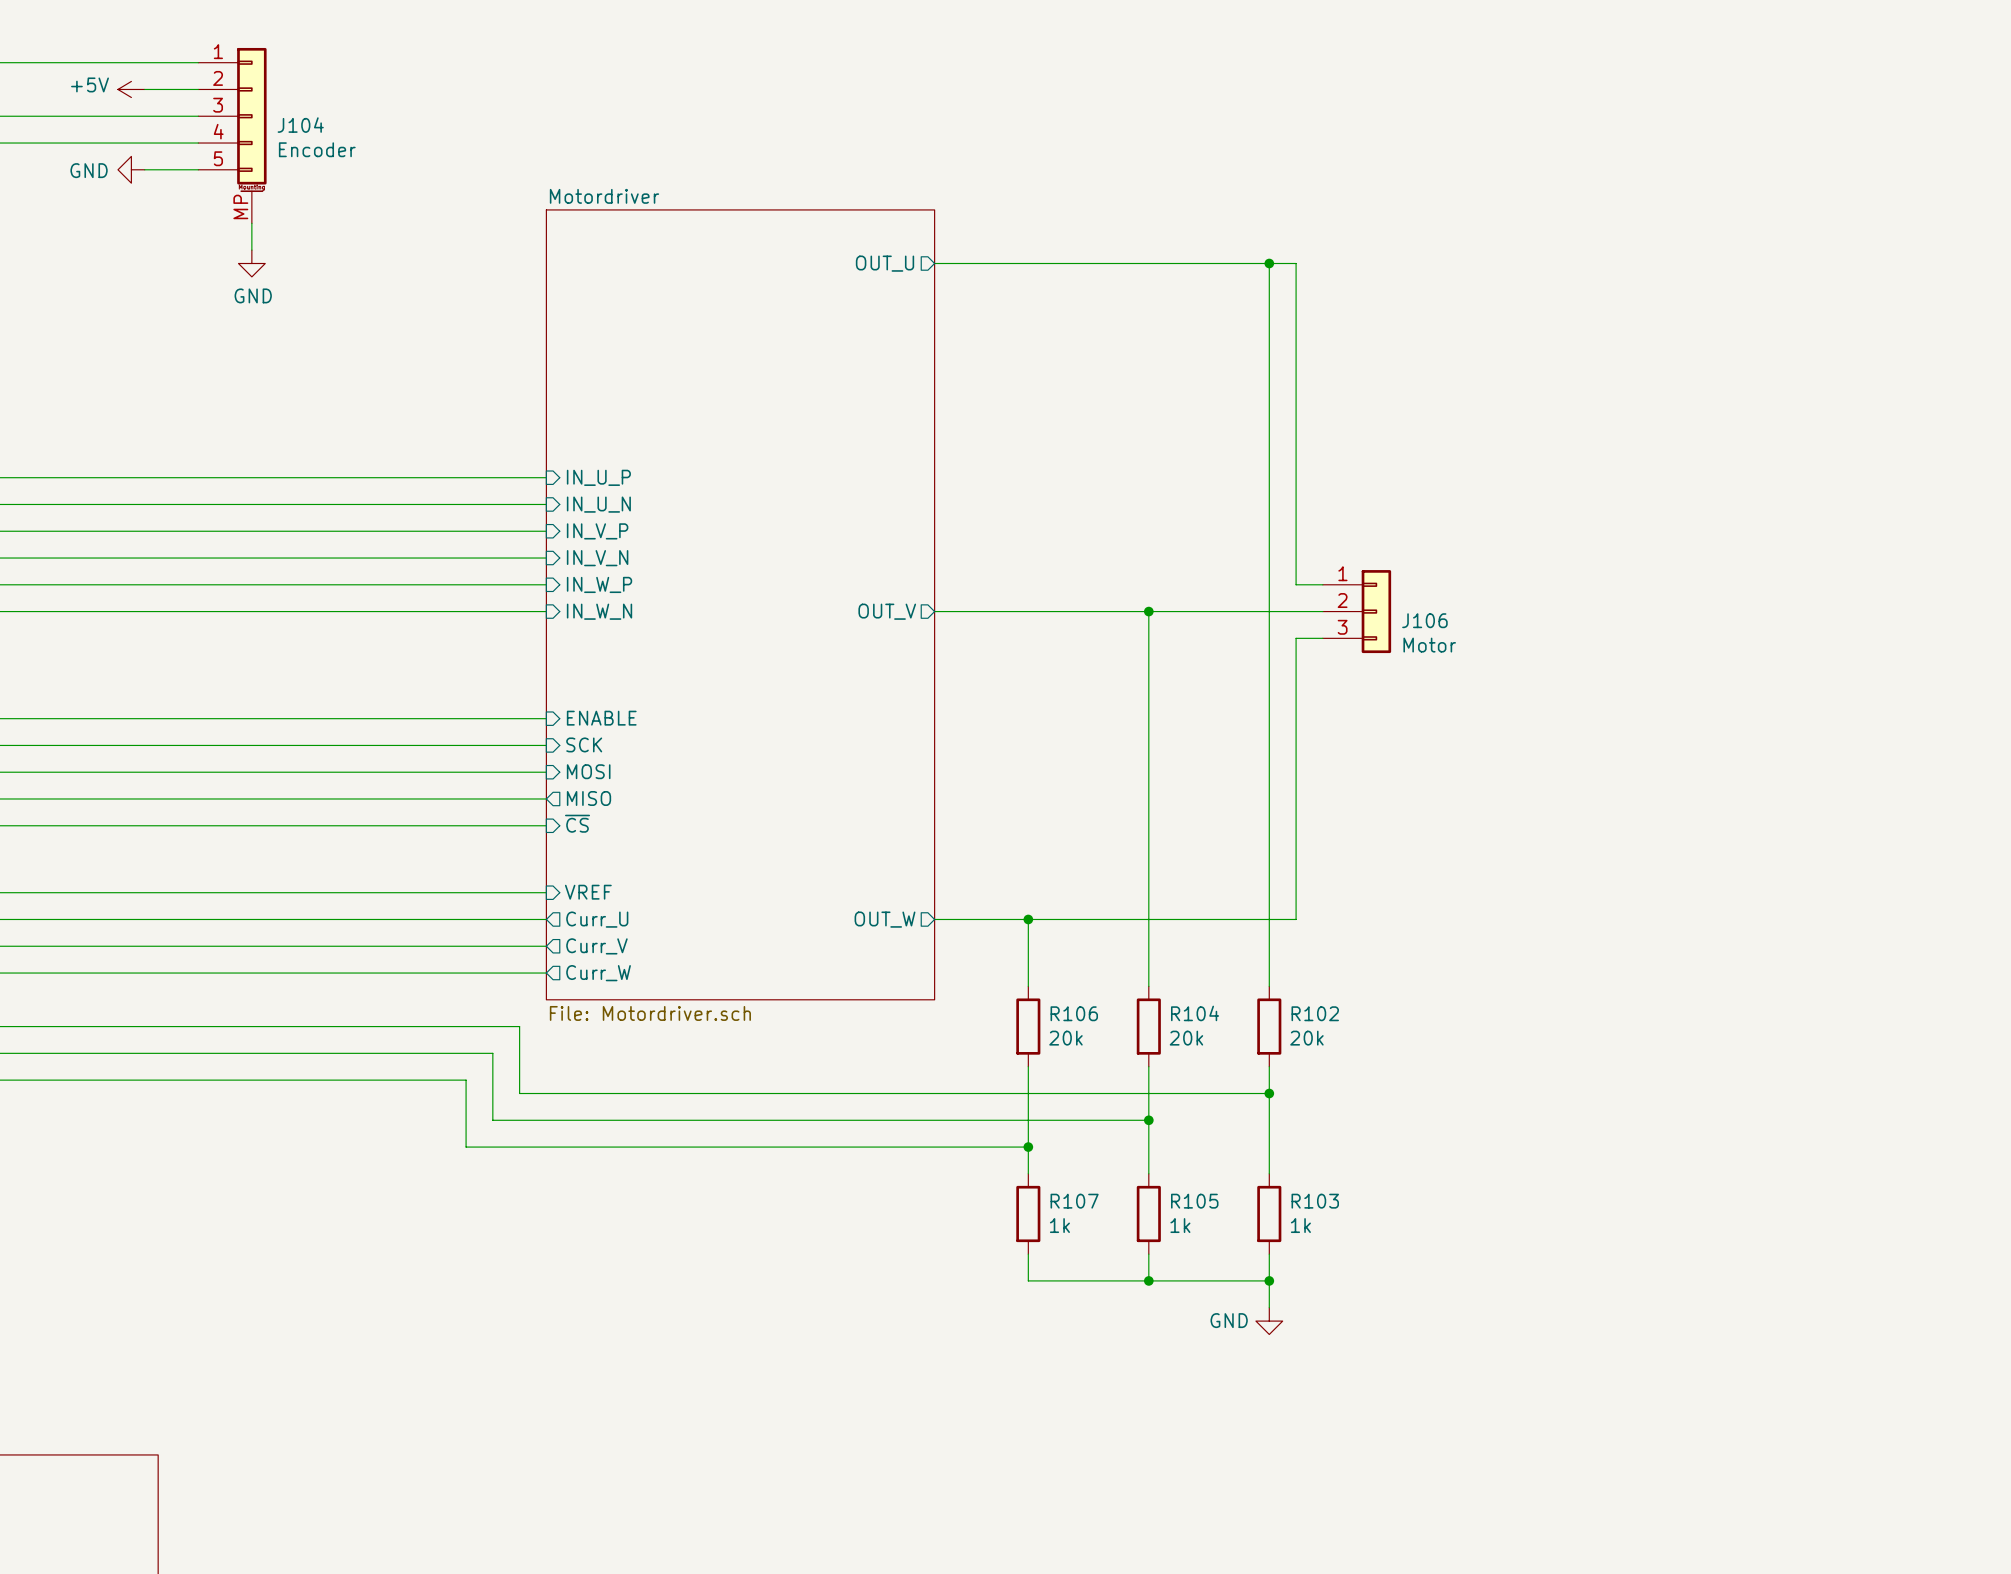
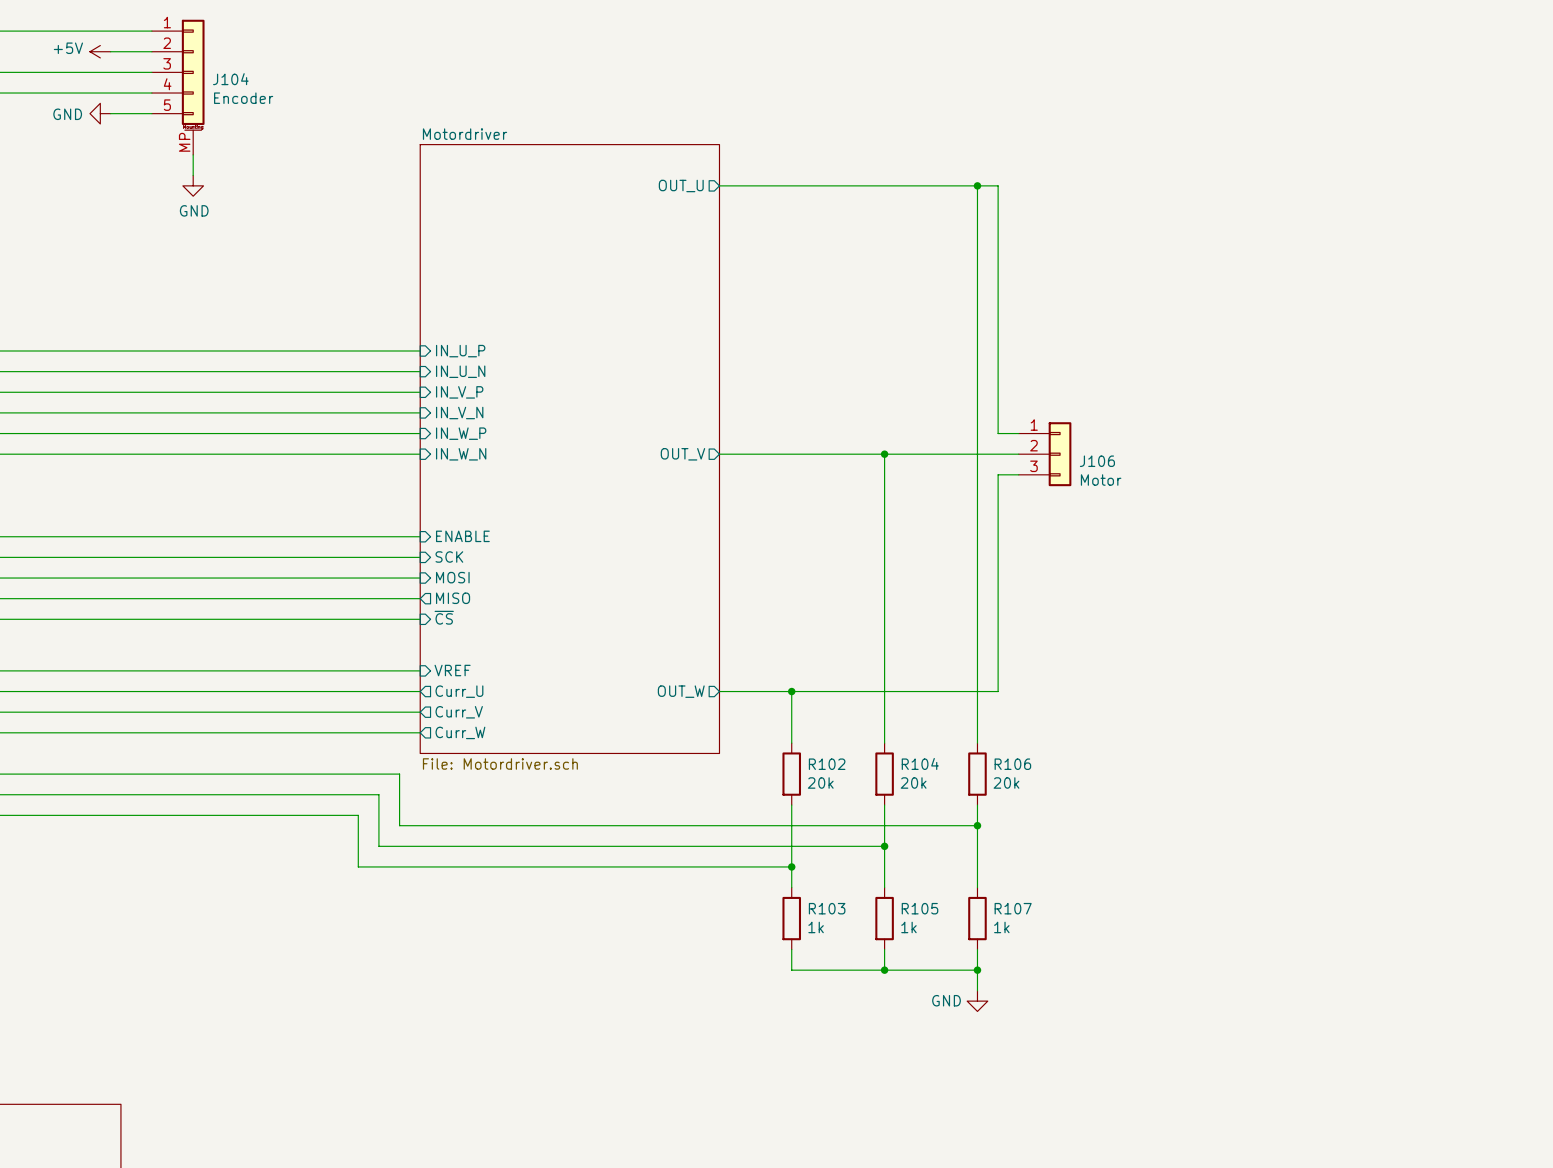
R106 name: R106 (1074, 1013) -> R102 (827, 764)
R102 name: R102 (1315, 1013) -> R106 (1012, 764)
R107 name: R107 (1074, 1201) -> R103 (827, 908)
R103 name: R103 (1315, 1201) -> R107 (1013, 908)

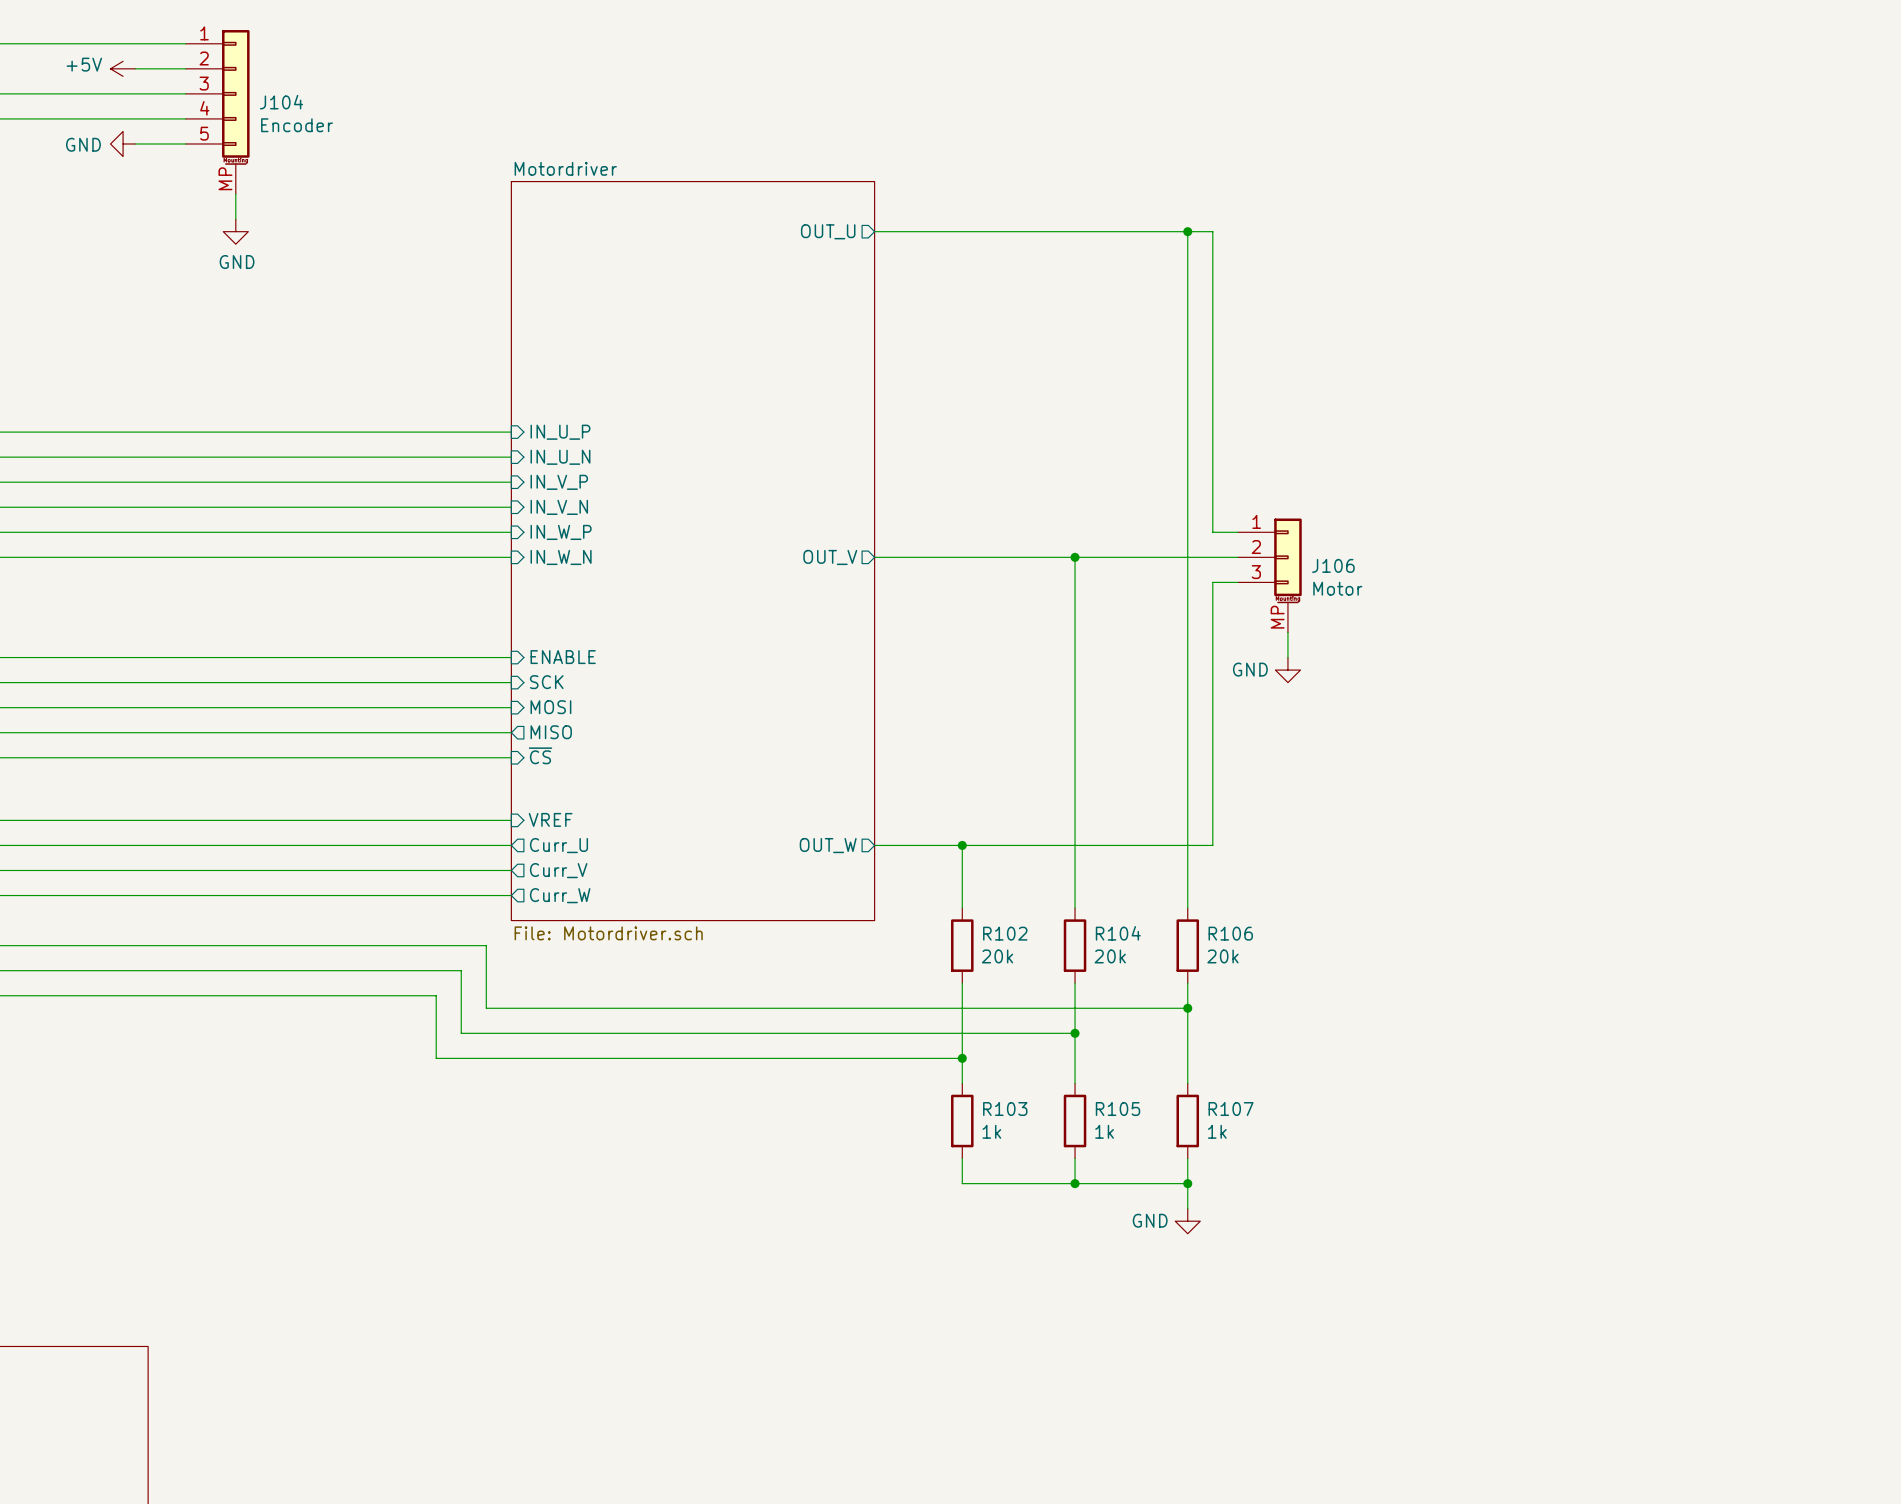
J106 symbol: [1018, 422, 1072, 487] -> [1237, 518, 1302, 633]
wire: none -> (1287, 632) (1287, 657)
power symbol: none -> GND (1287, 670)

